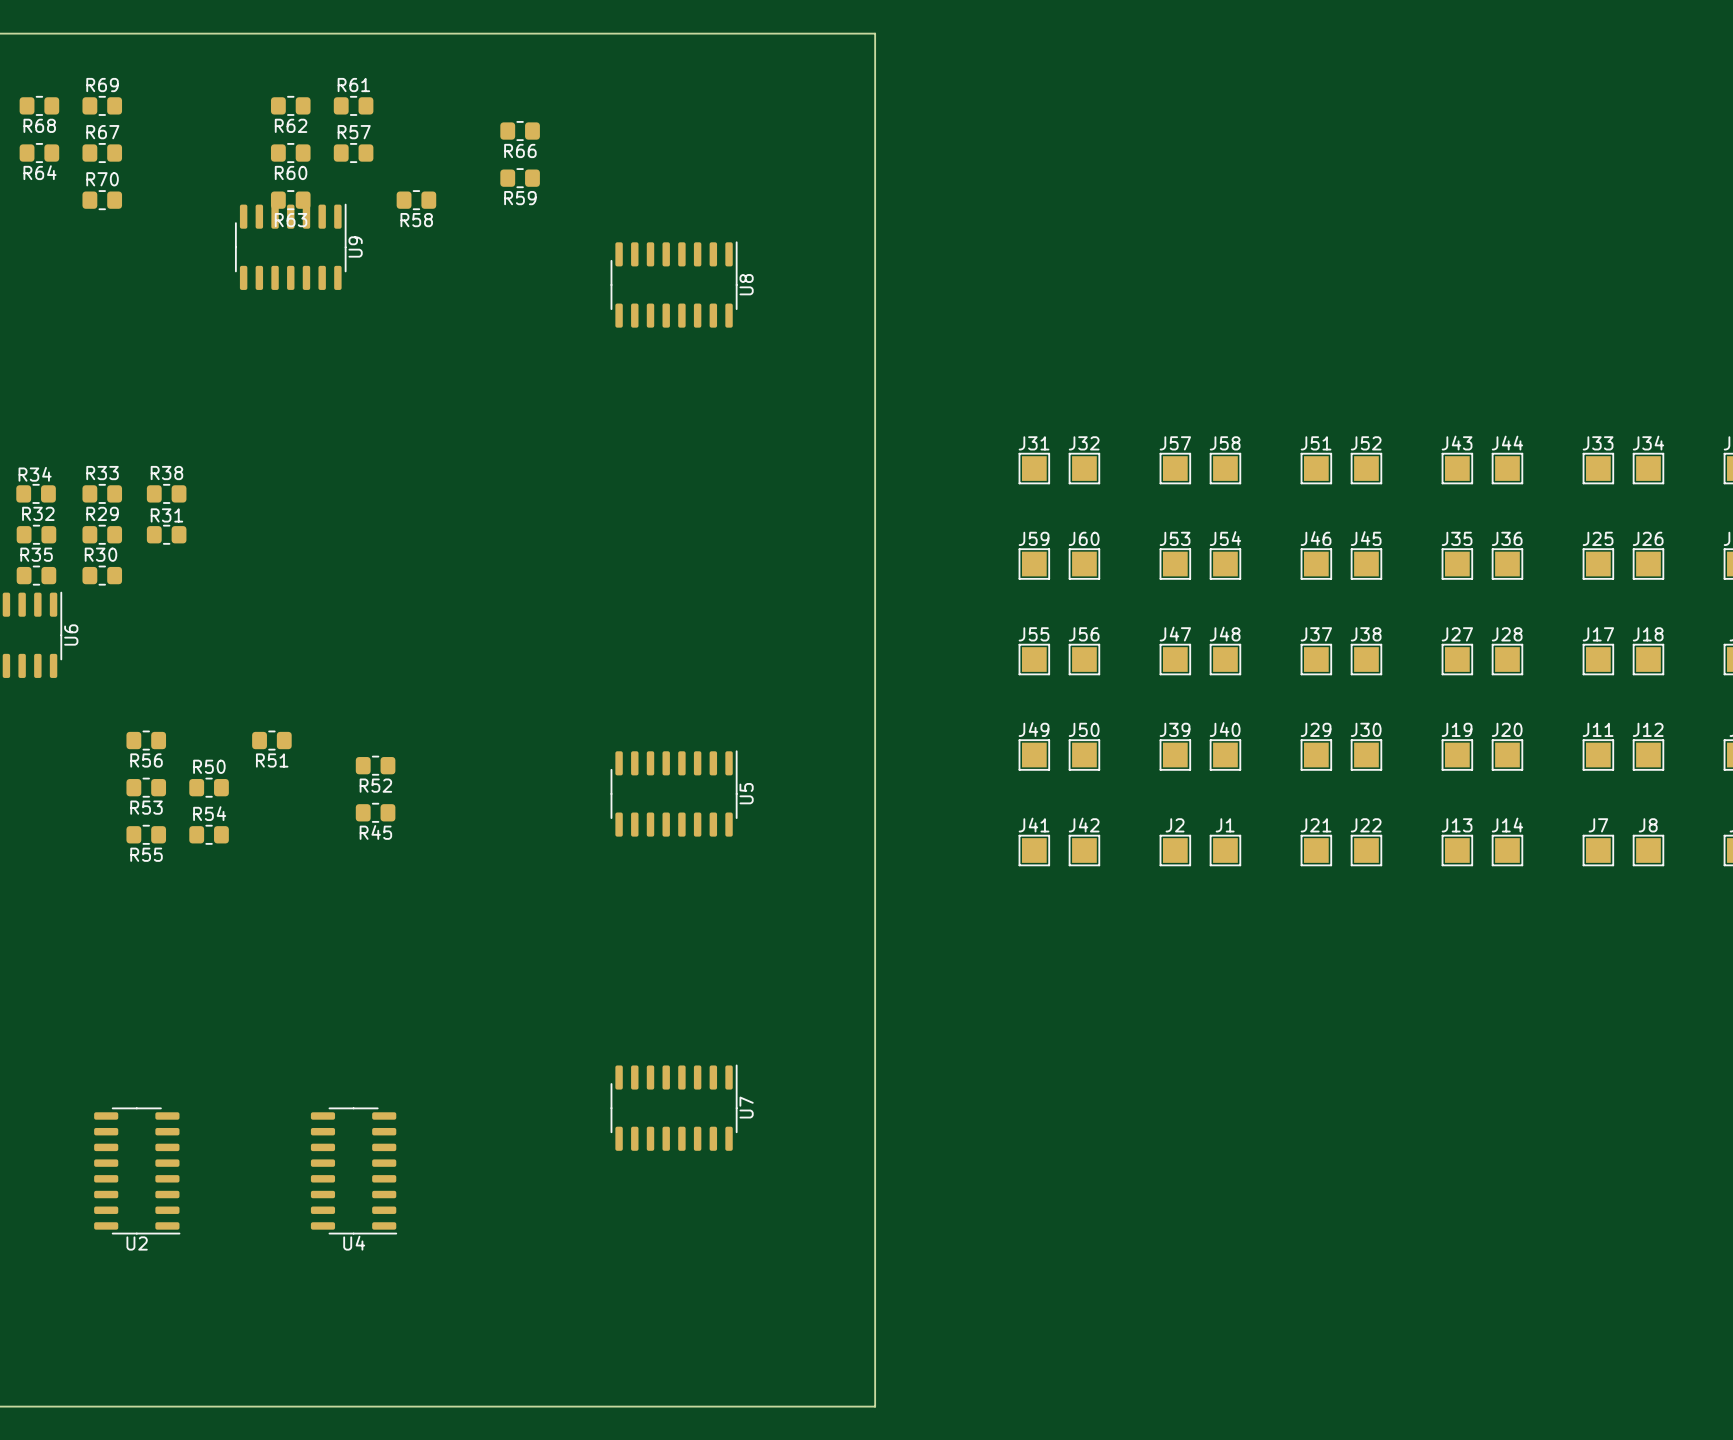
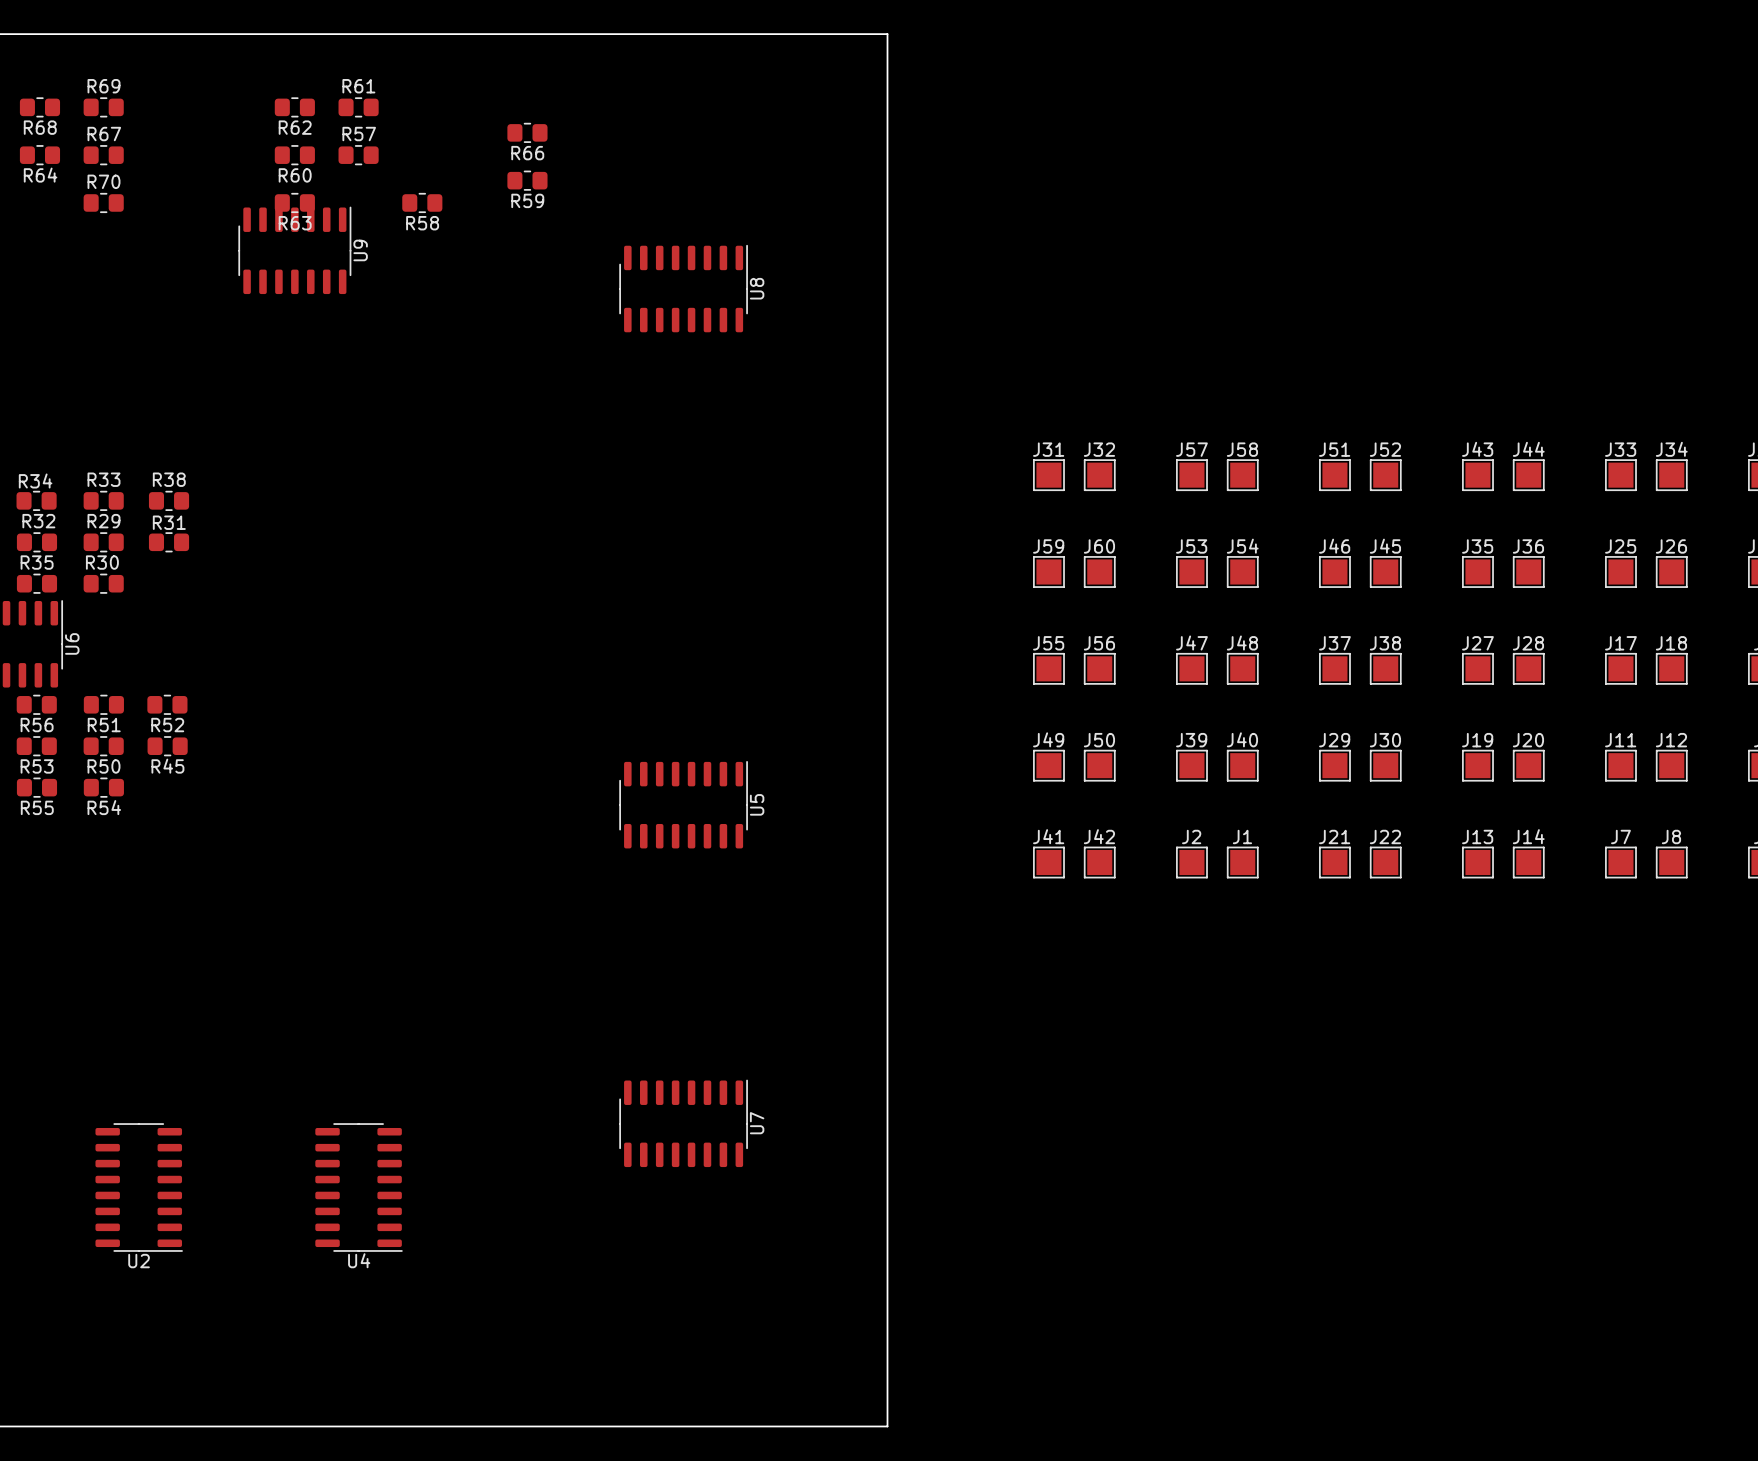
R56 position: (146, 740) -> (36, 704)
R51 position: (271, 740) -> (103, 704)
R52 position: (375, 765) -> (167, 704)
R50 name position: R50 (209, 766) -> R50 (103, 766)
R53 position: (146, 787) -> (36, 746)
R50 position: (209, 787) -> (103, 746)
R45 position: (375, 812) -> (167, 746)
R54 name position: R54 (209, 813) -> R54 (104, 807)
R55 position: (146, 834) -> (36, 787)
R54 position: (209, 834) -> (103, 787)

